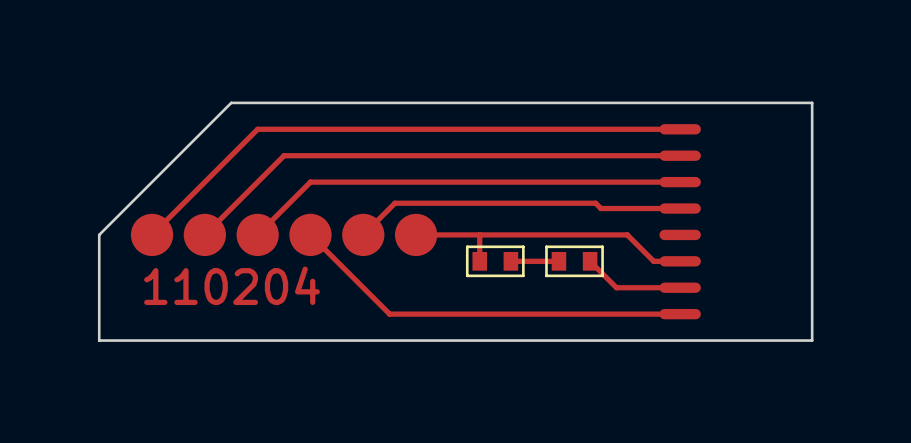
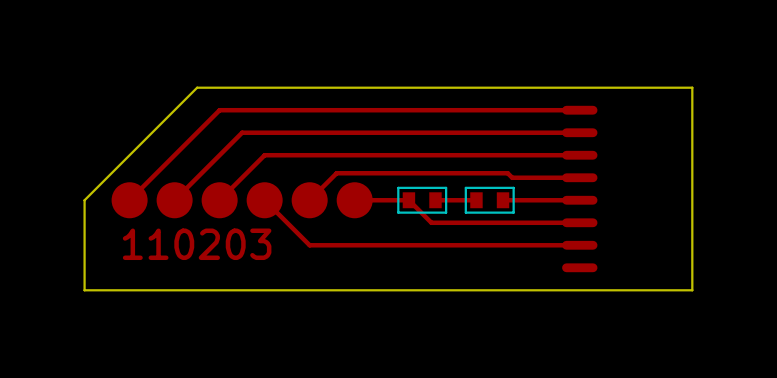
top track: none -> (408, 200) (431, 222) (435, 222)
top track: (510, 234) (479, 234) (479, 261) -> none
top track: (558, 234) (590, 234) -> none
top track: (627, 234) (653, 261) -> (534, 200) (579, 200)
part position: (495, 261) -> (422, 200)
top track: none -> (476, 222) (557, 222)
part position: (574, 261) -> (489, 200)
top track: (590, 261) (616, 287) -> none
text: 110204 (232, 285) -> 110203 (197, 244)
top track: (363, 287) (389, 314) (680, 314) -> (309, 245) (525, 245)

